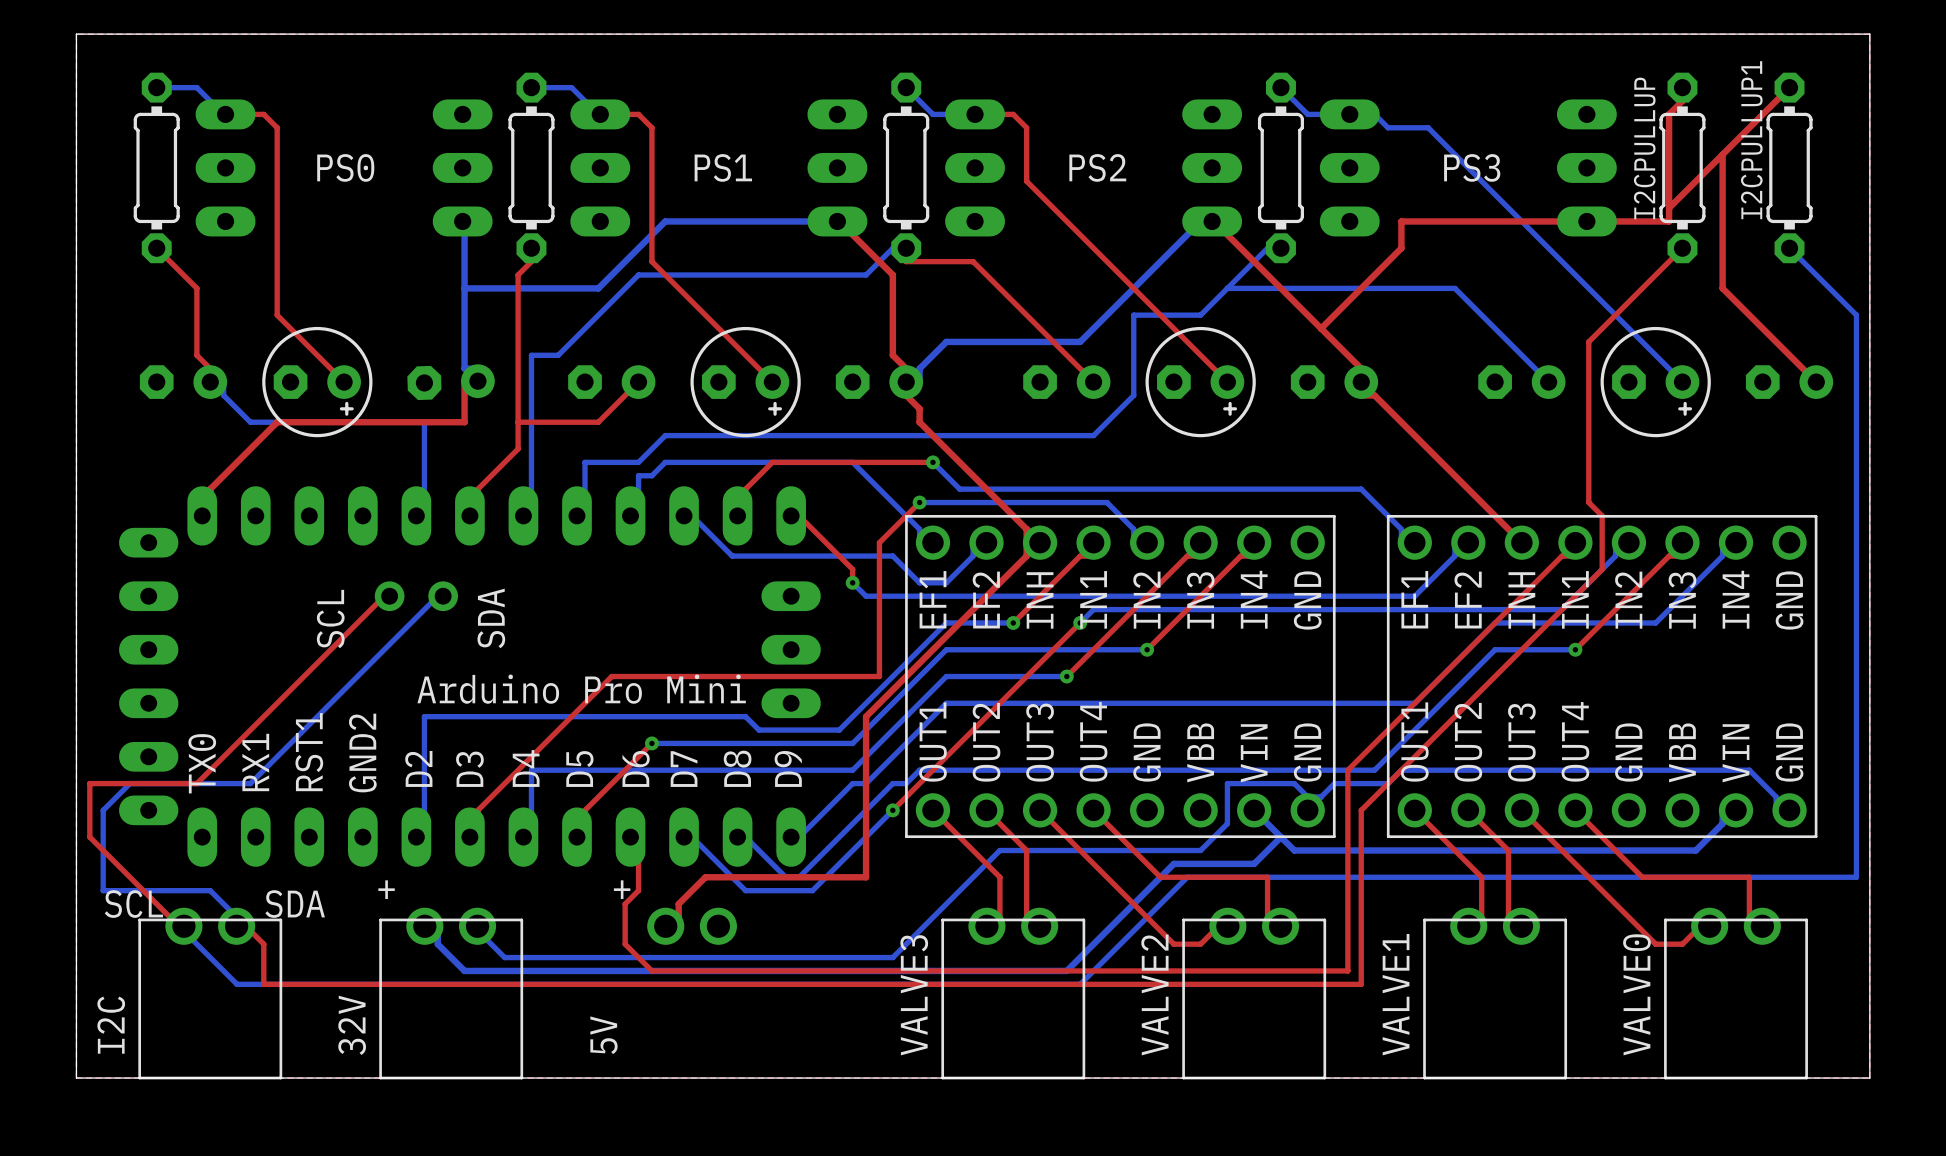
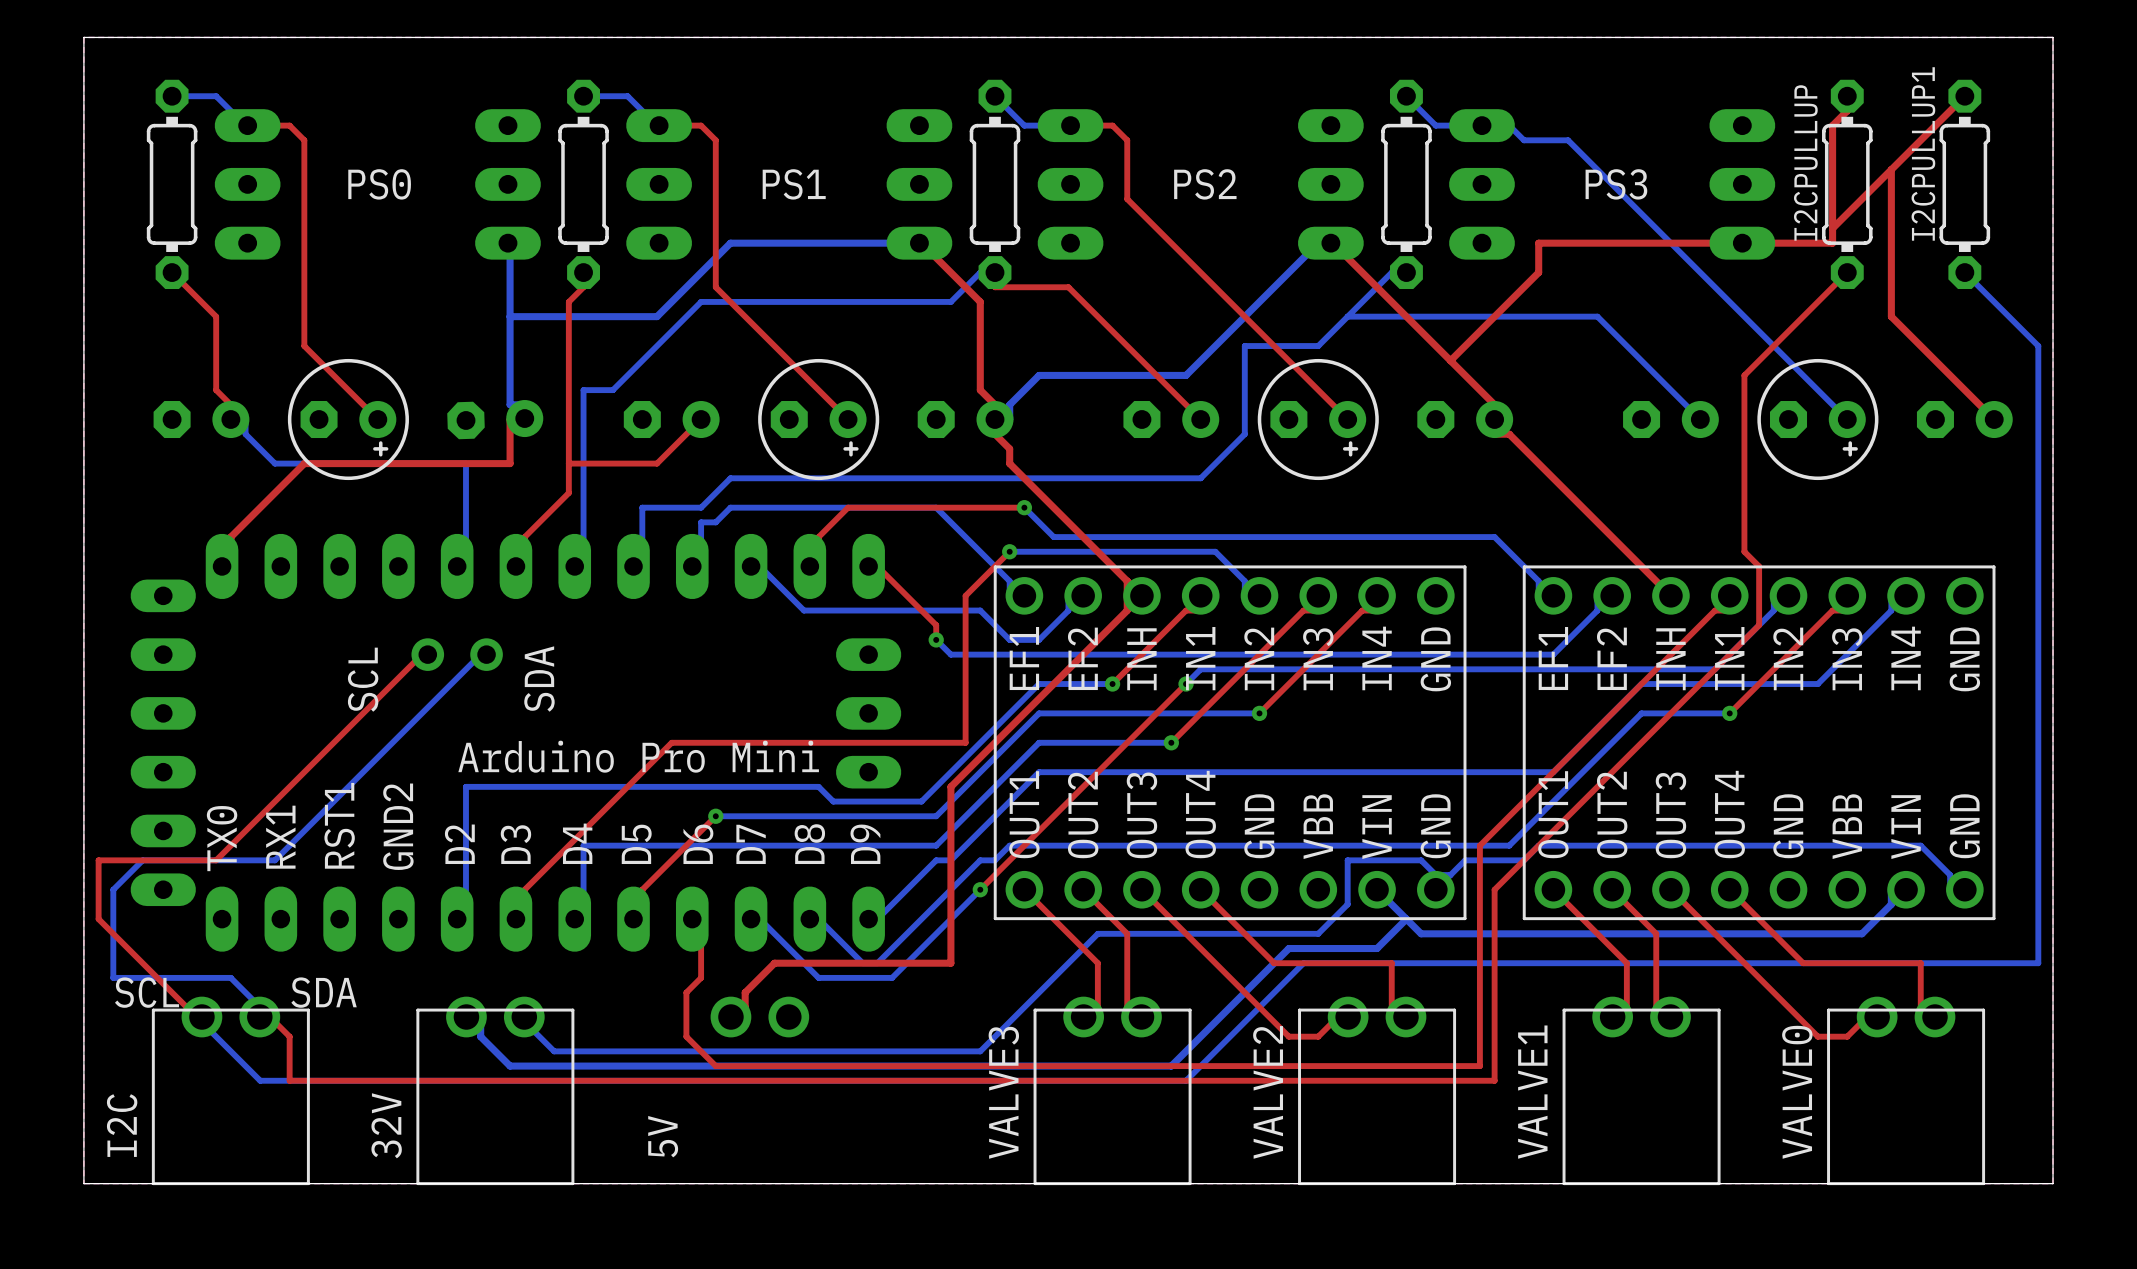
text: + (386, 889) -> none
text: + (622, 889) -> none

